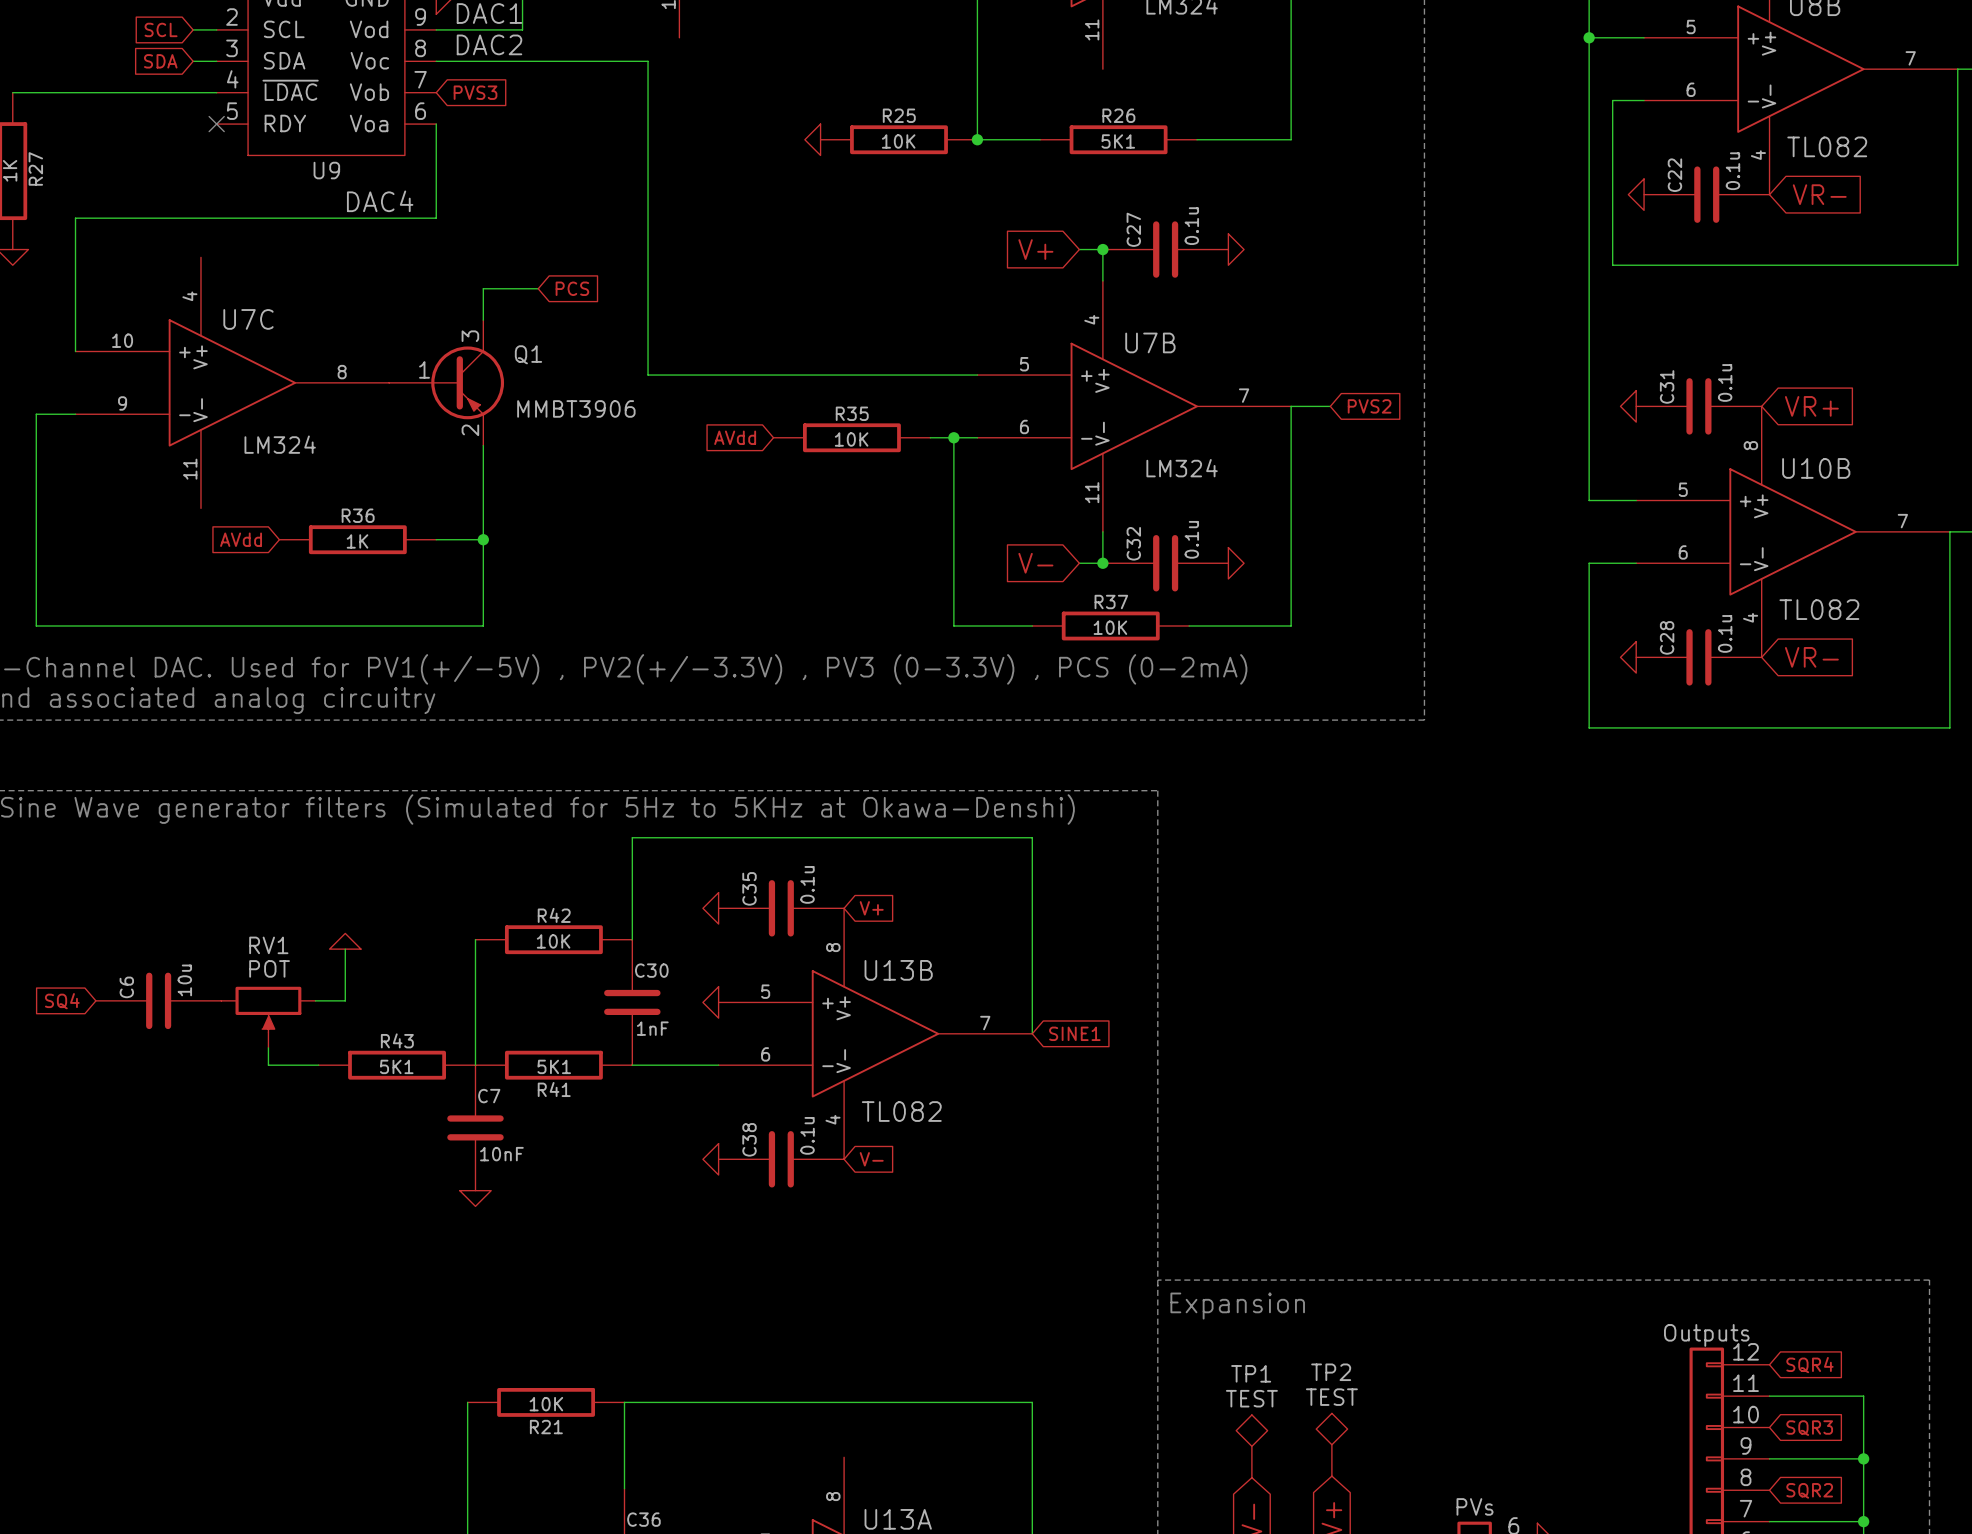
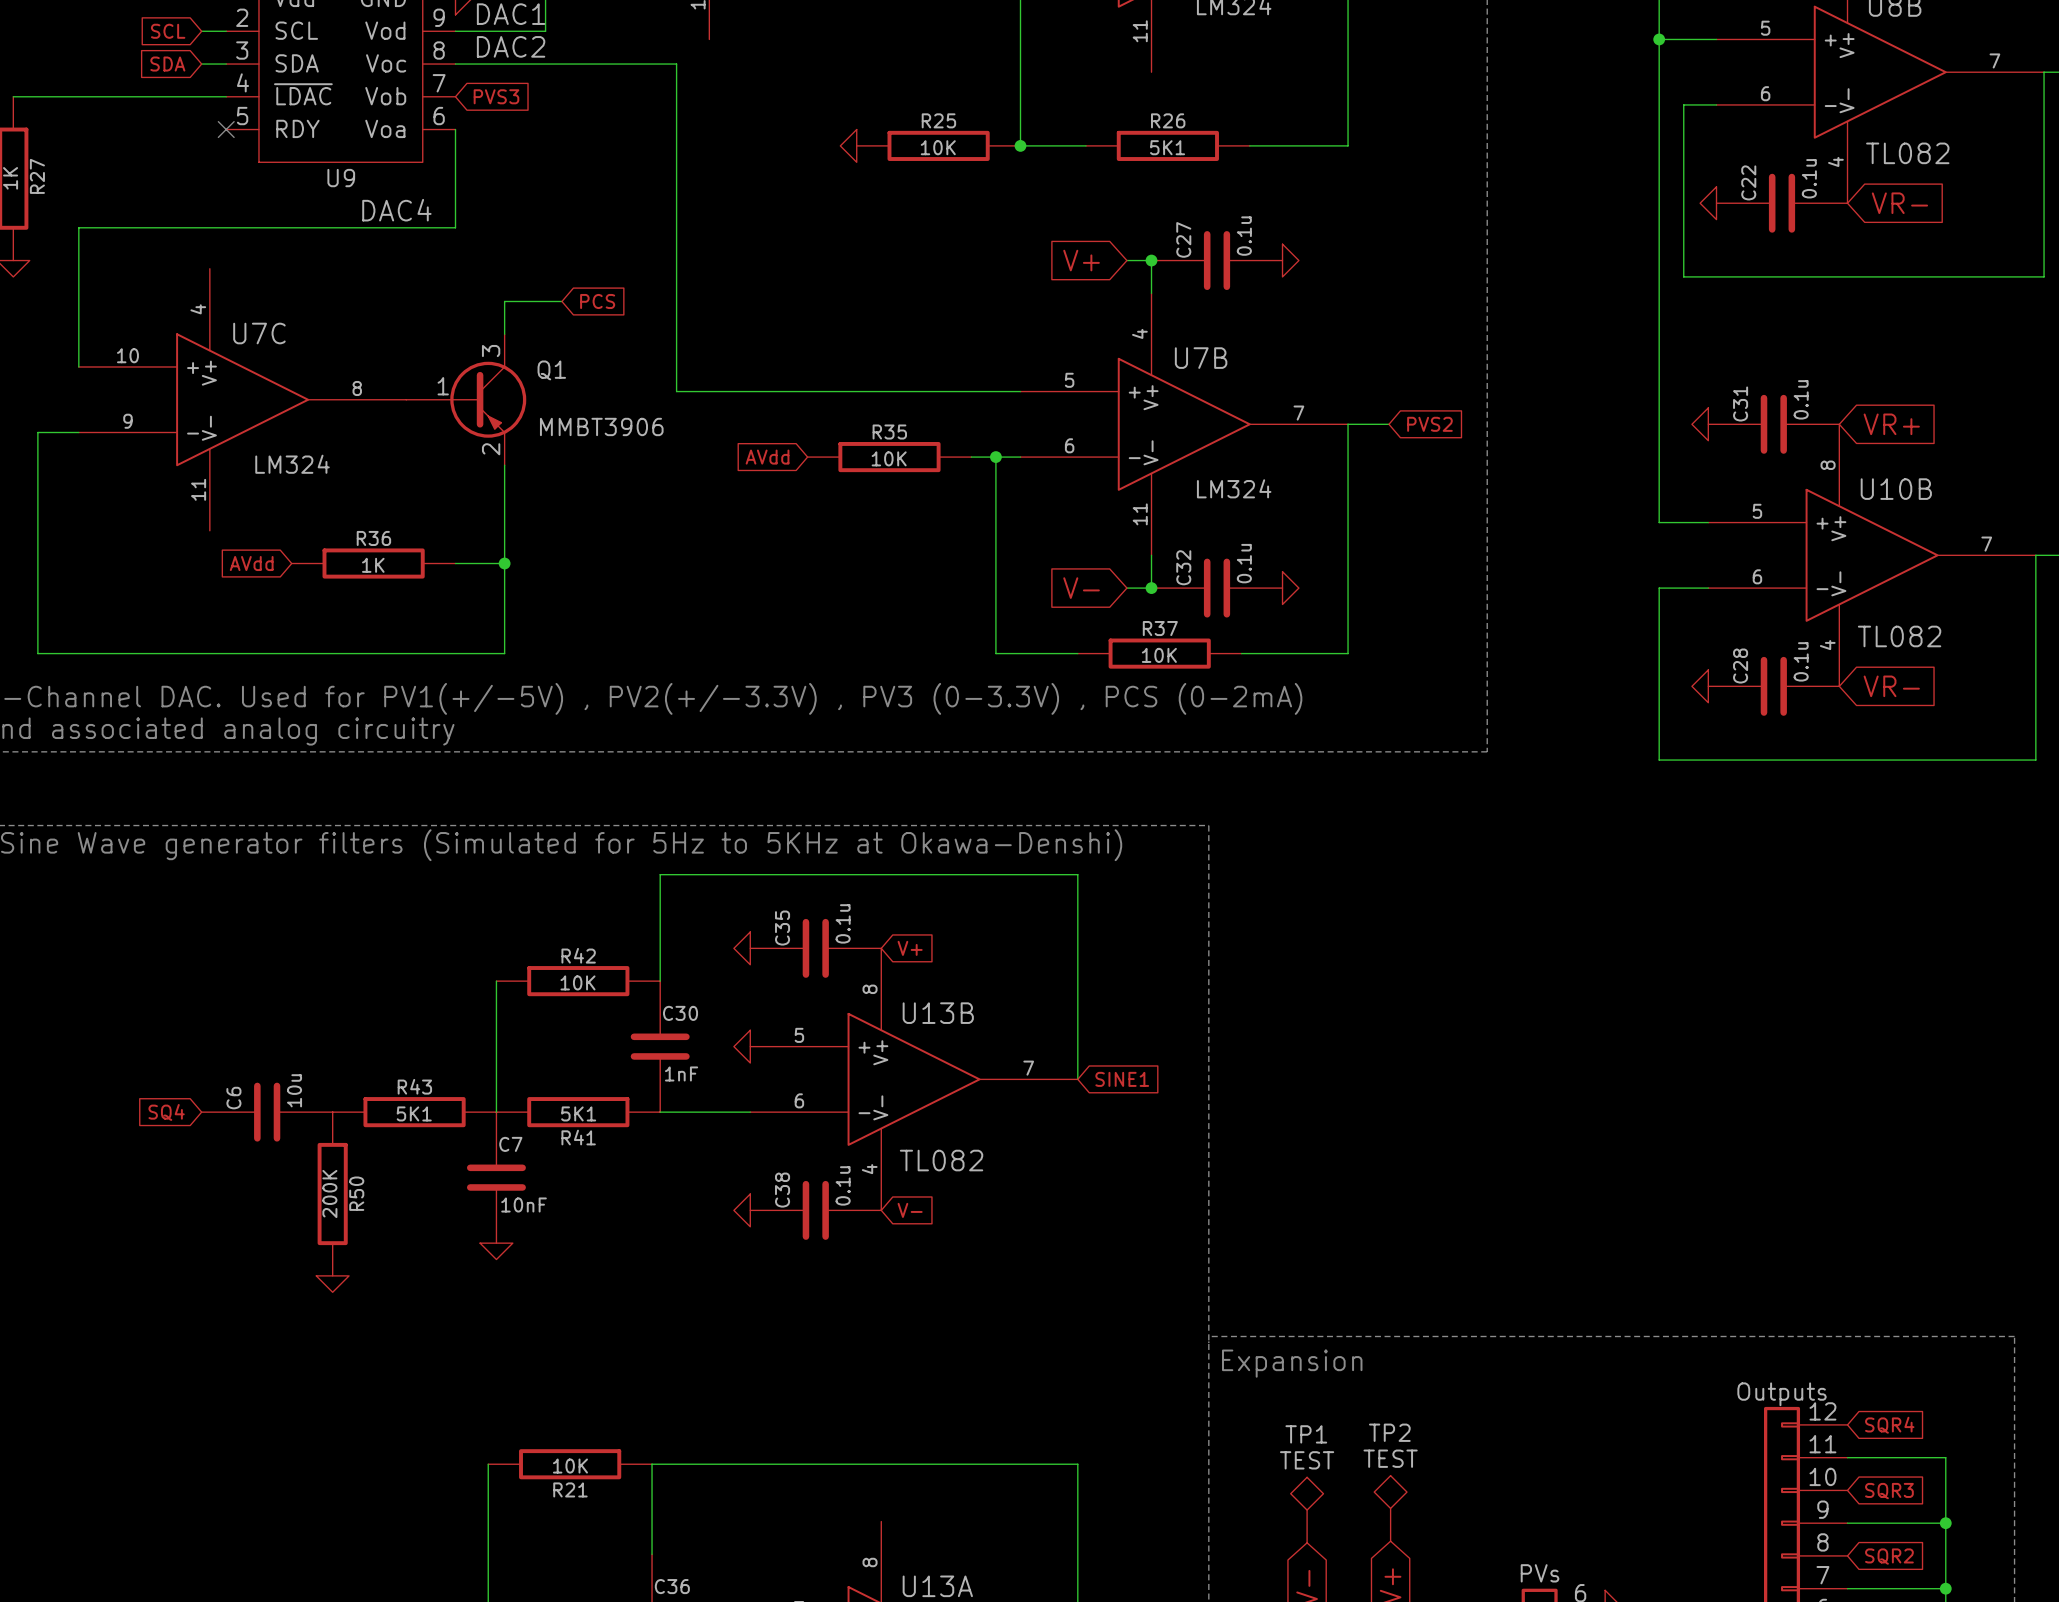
power symbol rotation: 0° (345, 941) -> 180° (332, 1284)
power symbol position: (345, 941) -> (332, 1284)
wire: (345, 949) (345, 1000) (315, 1000) -> none
C6 position: (158, 1000) -> (267, 1112)
global label position: SQ4 (62, 1001) -> SQ4 (166, 1112)
RV1: POT (268, 1017) -> none
R50: none -> 200K (332, 1194)

